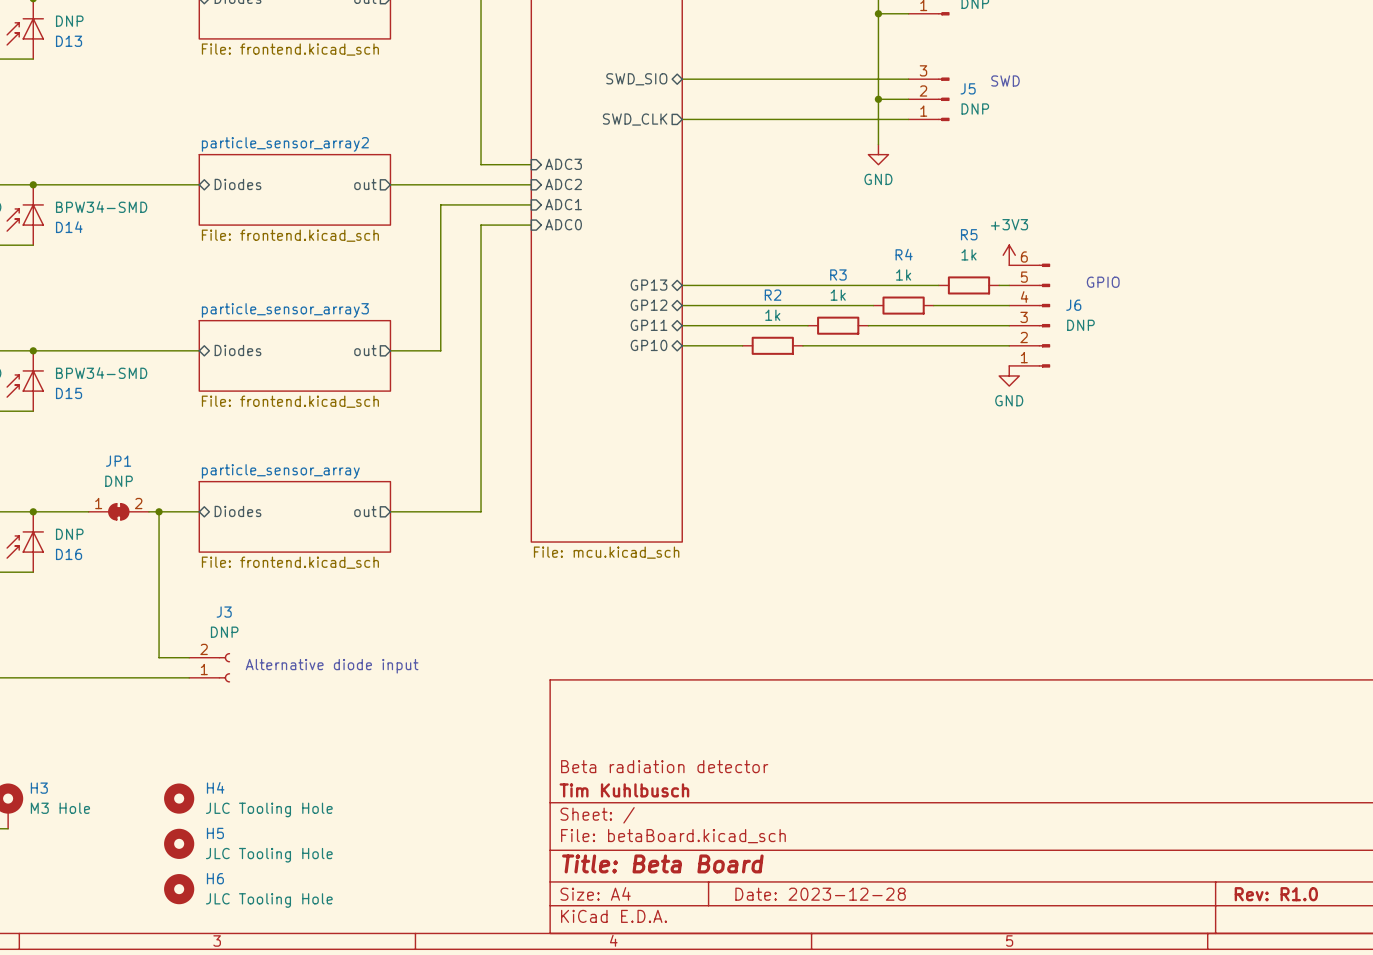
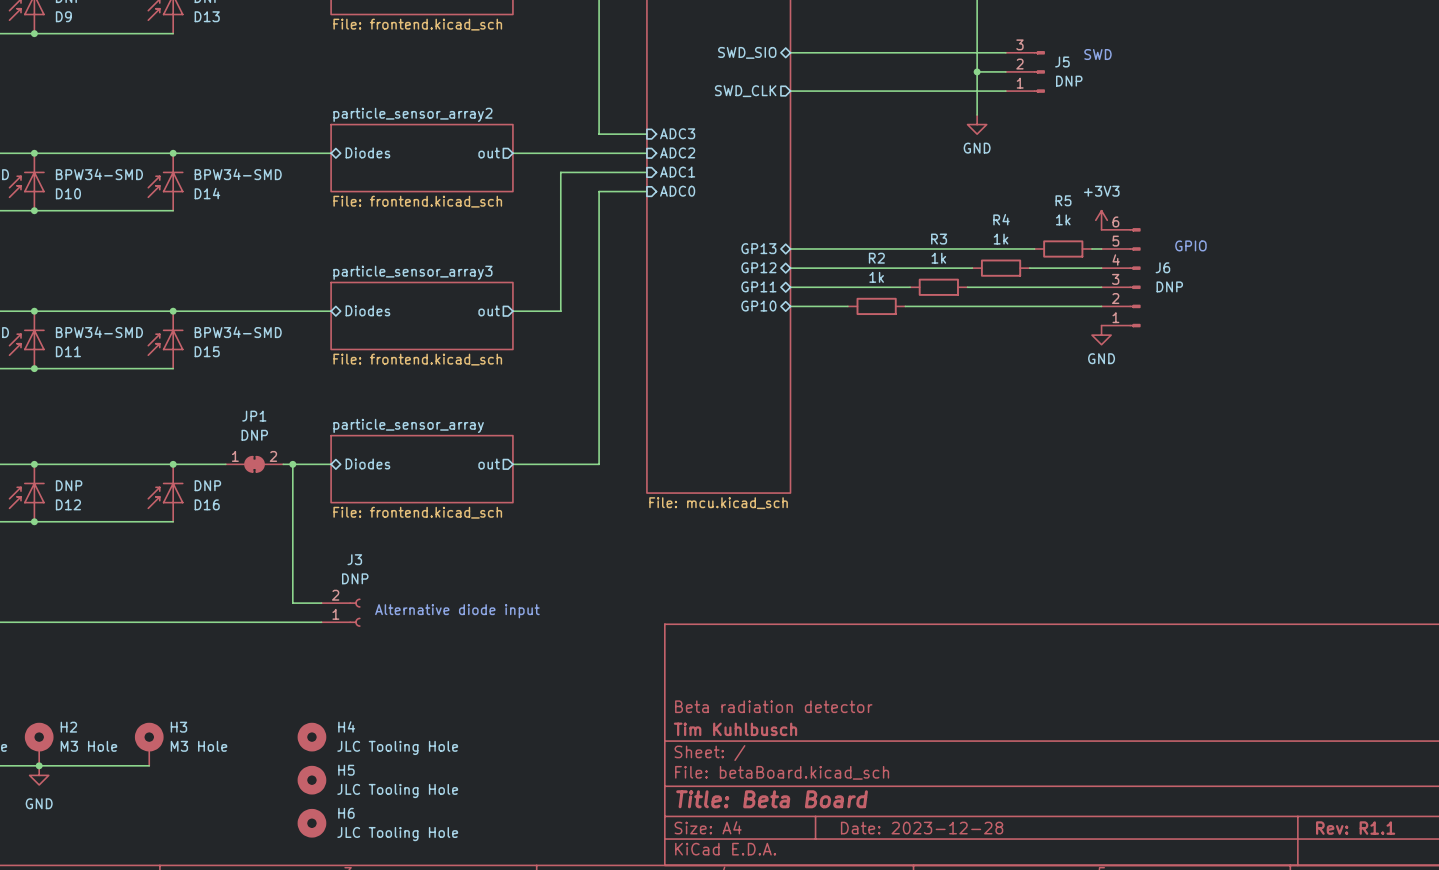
title block: Rev: R1.0 (1276, 894) -> Rev: R1.1 (1355, 828)

